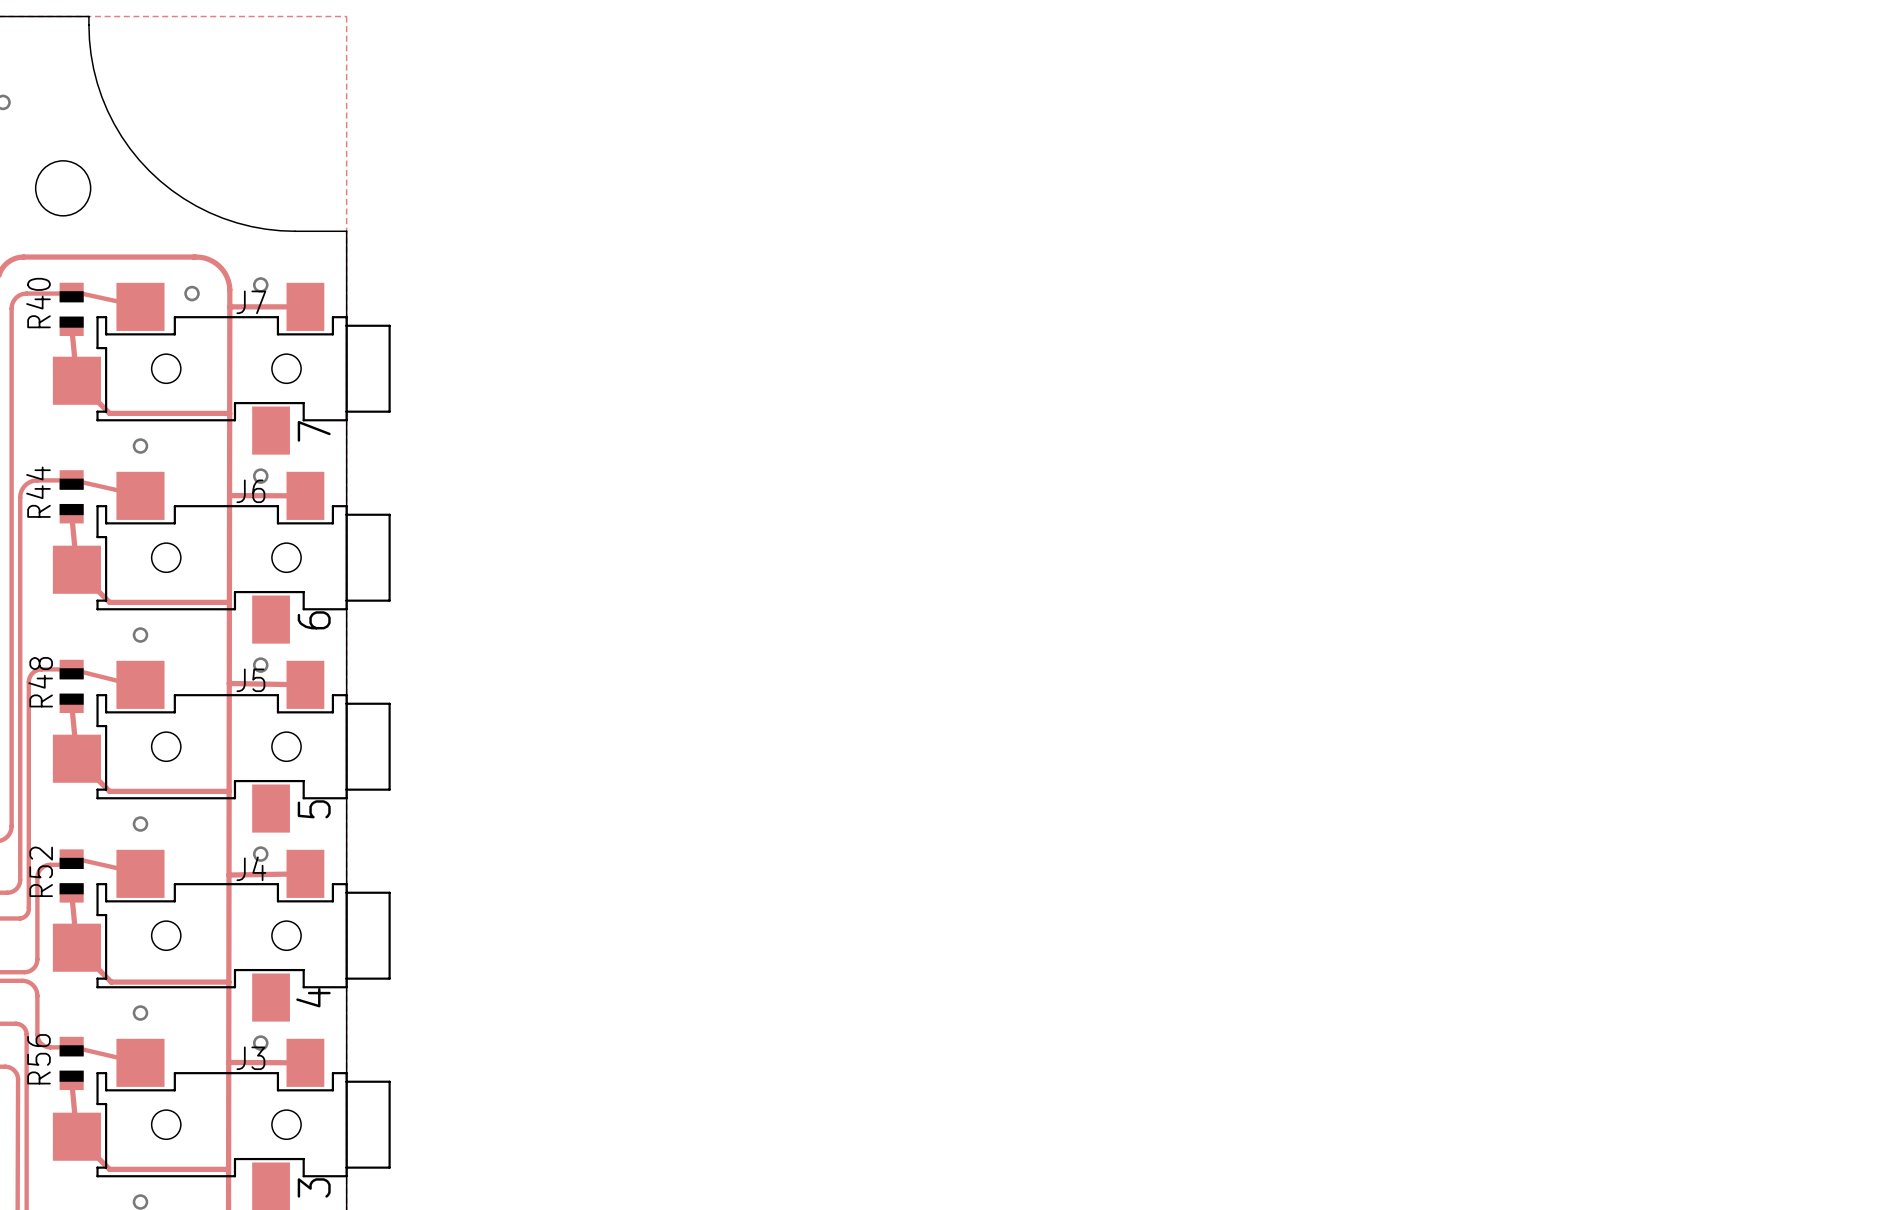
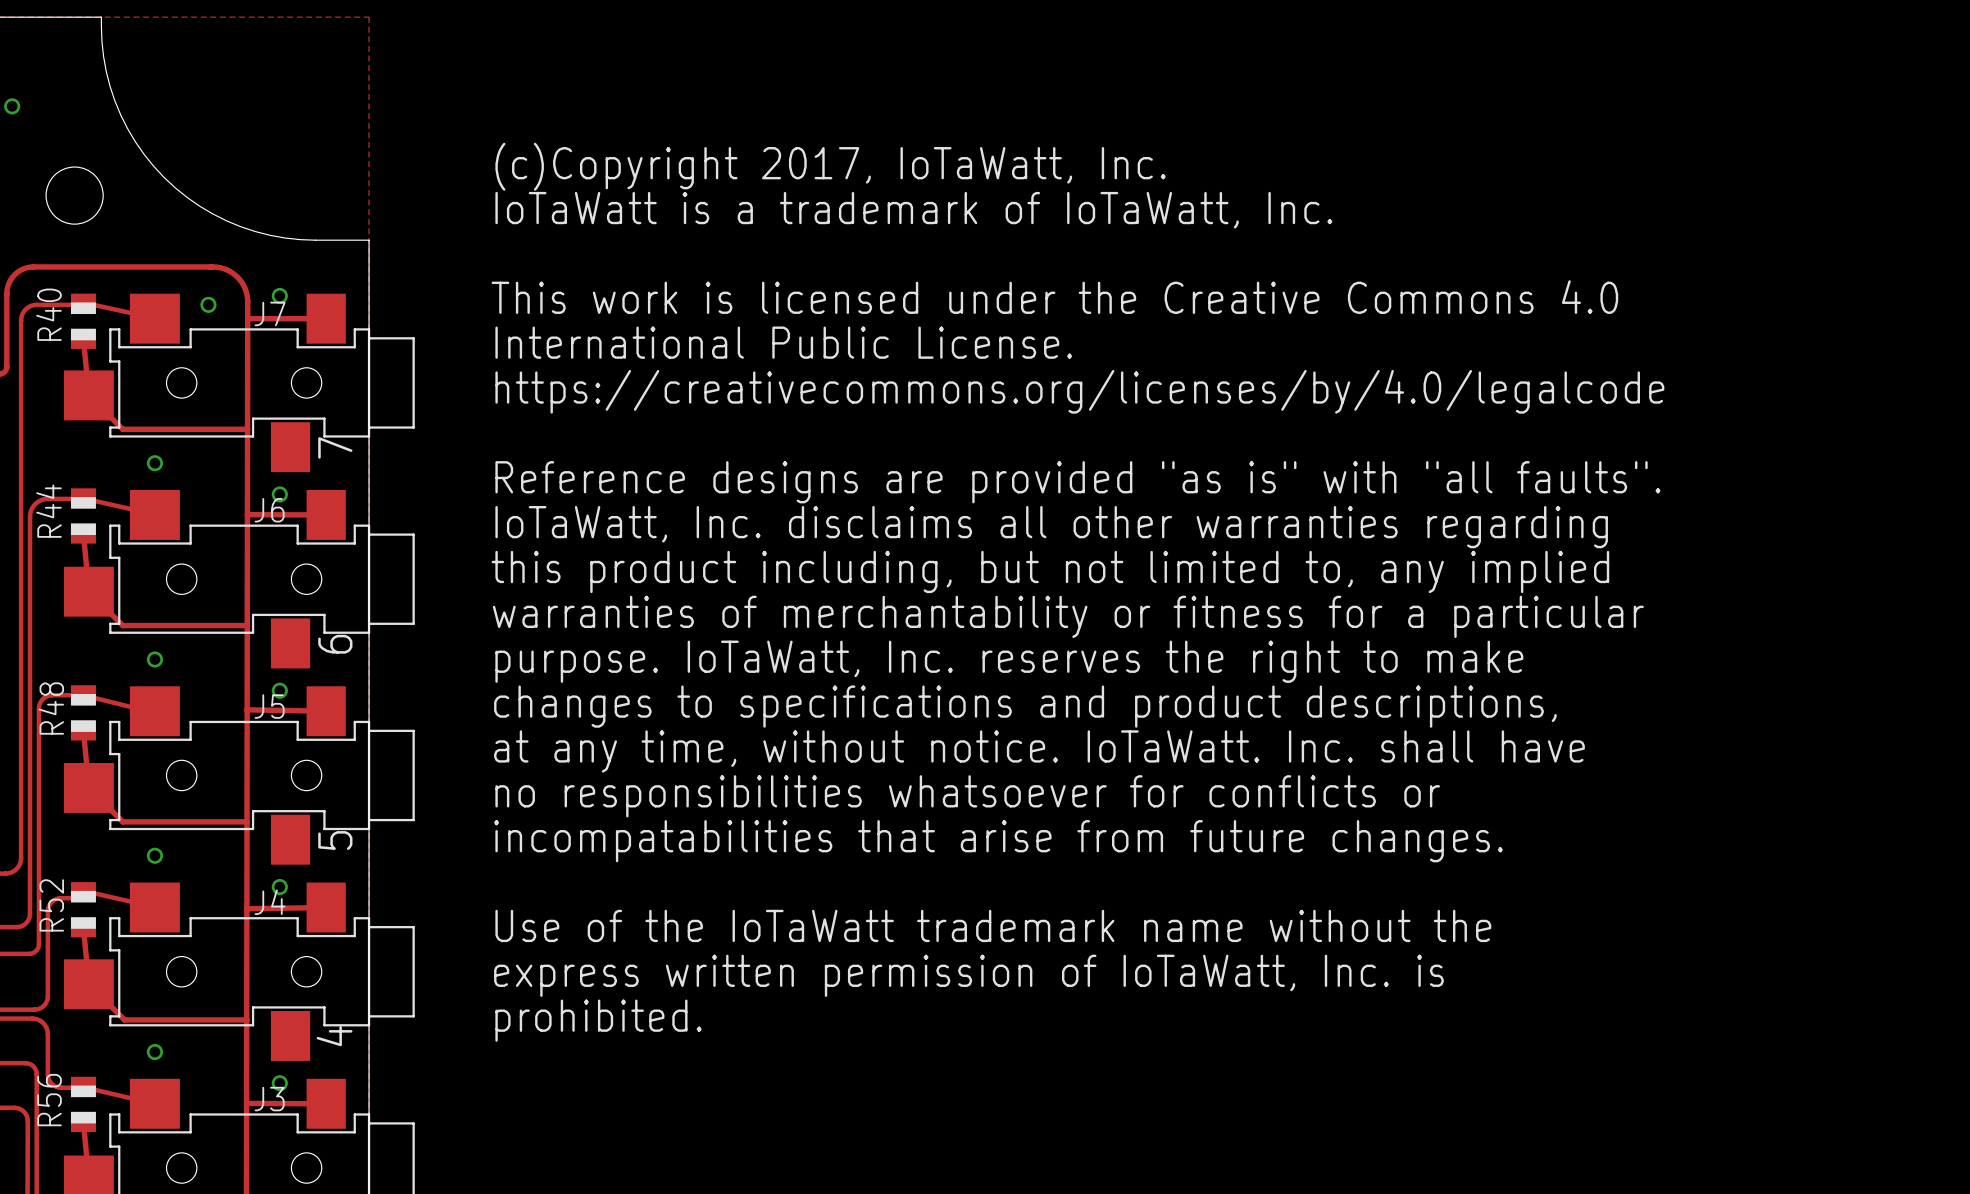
text: none -> (c)Copyright 2017, IoTaWatt, Inc. (830, 166)
text: none -> IoTaWatt is a trademark of IoTaWatt, Inc. (913, 210)
text: none -> This work is licensed under the Creative Commons 4.0 (1054, 297)
text: none -> International Public License. (783, 342)
text: none -> https://creativecommons.org/licenses/by/4.0/legalcode (1079, 391)
text: none -> Reference designs are provided "as is" with "all faults". (1077, 482)
text: none -> IoTaWatt, Inc. disclaims all other warranties regarding (1051, 527)
text: none -> this product including, but not limited to, any implied (1050, 571)
text: none -> warranties of merchantability or fitness for a particular (1068, 616)
text: none -> purpose. IoTaWatt, Inc. reserves the right to make (1009, 661)
text: none -> changes to specifications and product descriptions, (1025, 706)
text: none -> at any time, without notice. IoTaWatt. Inc. shall have (1039, 751)
text: none -> no responsibilities whatsoever for conflicts or (967, 796)
text: none -> incompatabilities that arise from future changes. (998, 841)
text: none -> Use of the IoTaWatt trademark name without the (993, 925)
text: none -> express written permission of IoTaWatt, Inc. is (968, 975)
text: none -> prohibited. (598, 1020)

